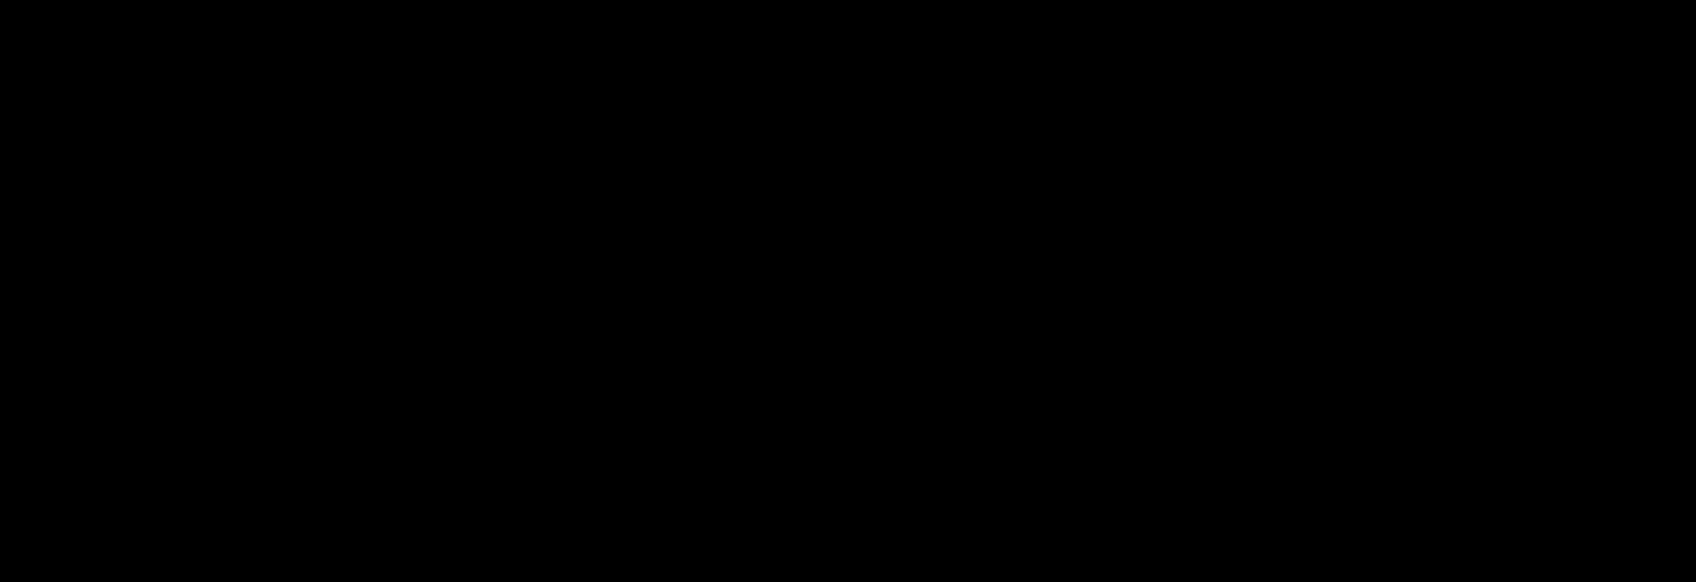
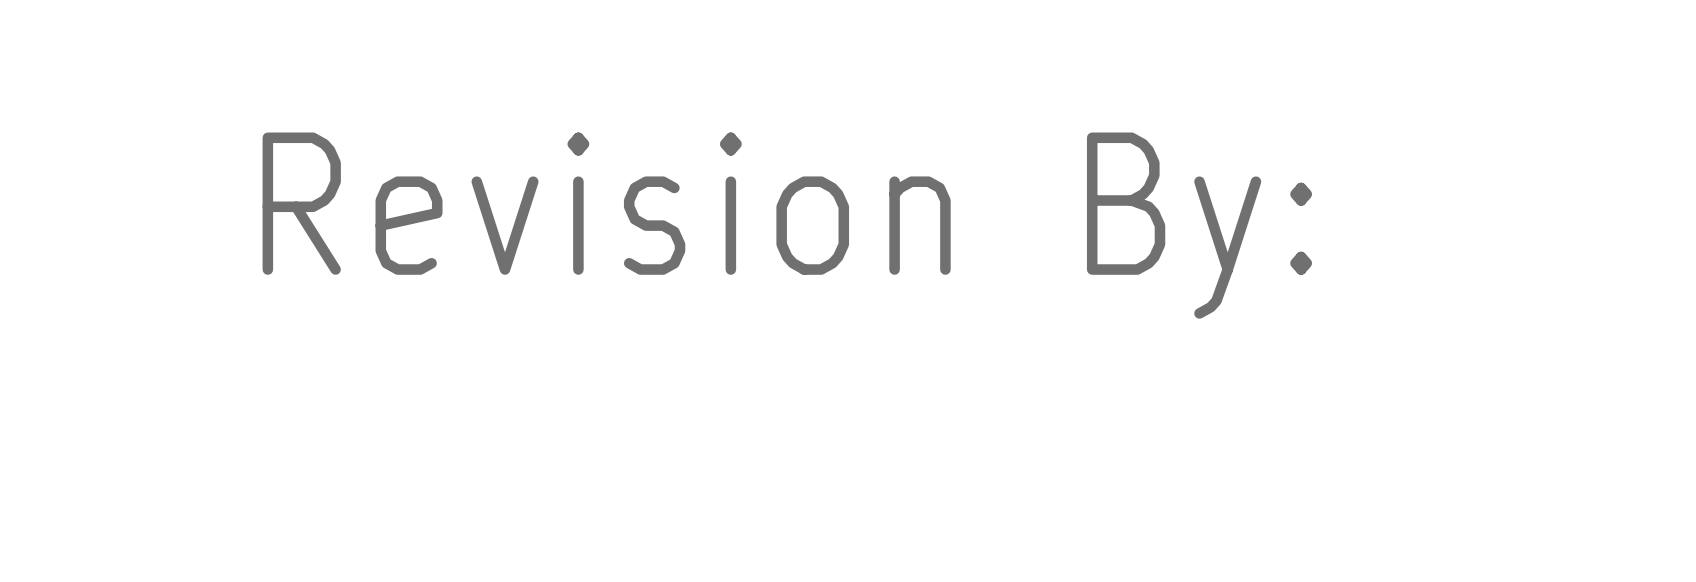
drawing: none -> [262, 132, 1313, 319]

